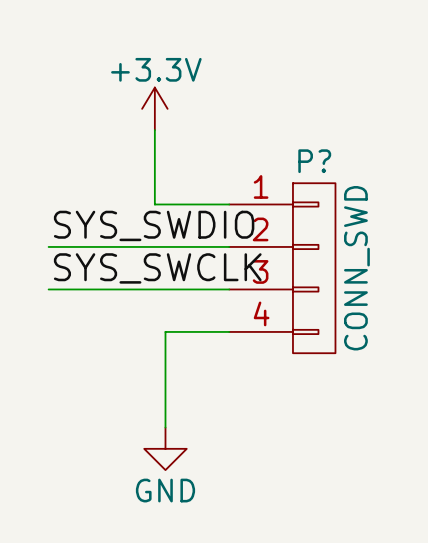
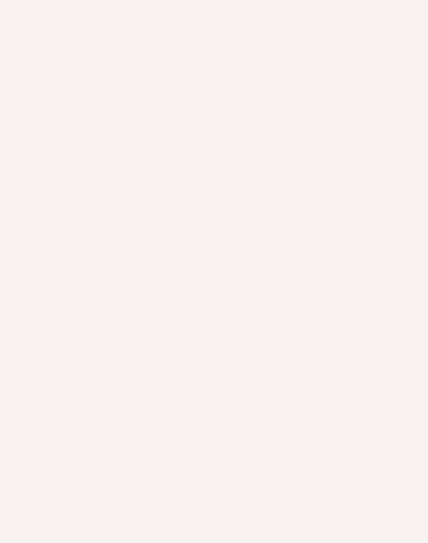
power symbol: +3.3V (154, 108) -> none
wire: (154, 130) (154, 204) (229, 204) -> none
label: SYS_SWDIO (154, 225) -> none
wire: (48, 246) (229, 246) -> none
label: SYS_SWCLK (157, 268) -> none
P?: CONN_SWD (282, 268) -> none
wire: (48, 289) (229, 289) -> none
wire: (229, 331) (165, 331) (165, 427) -> none
power symbol: GND (165, 448) -> none

